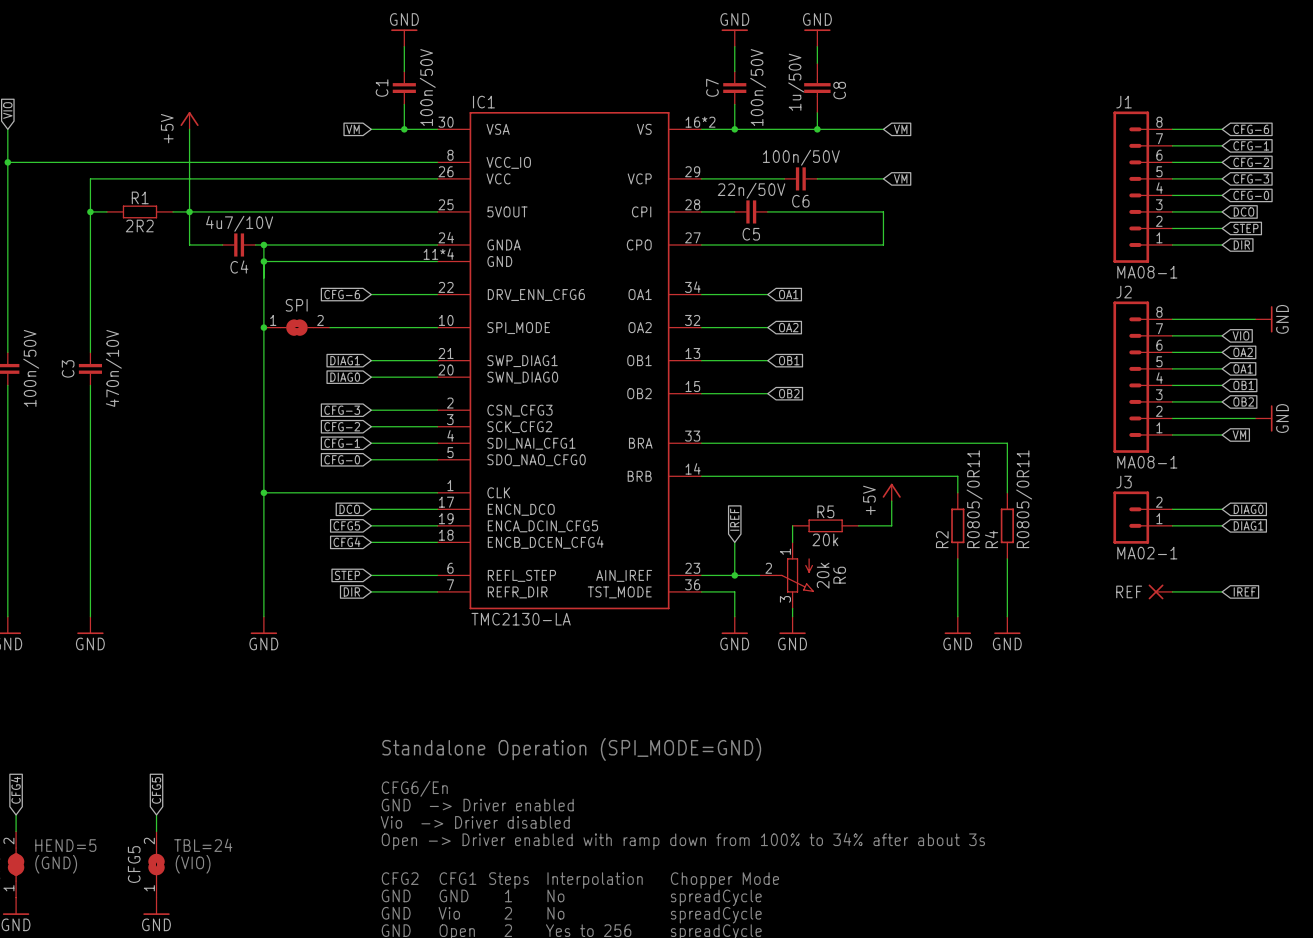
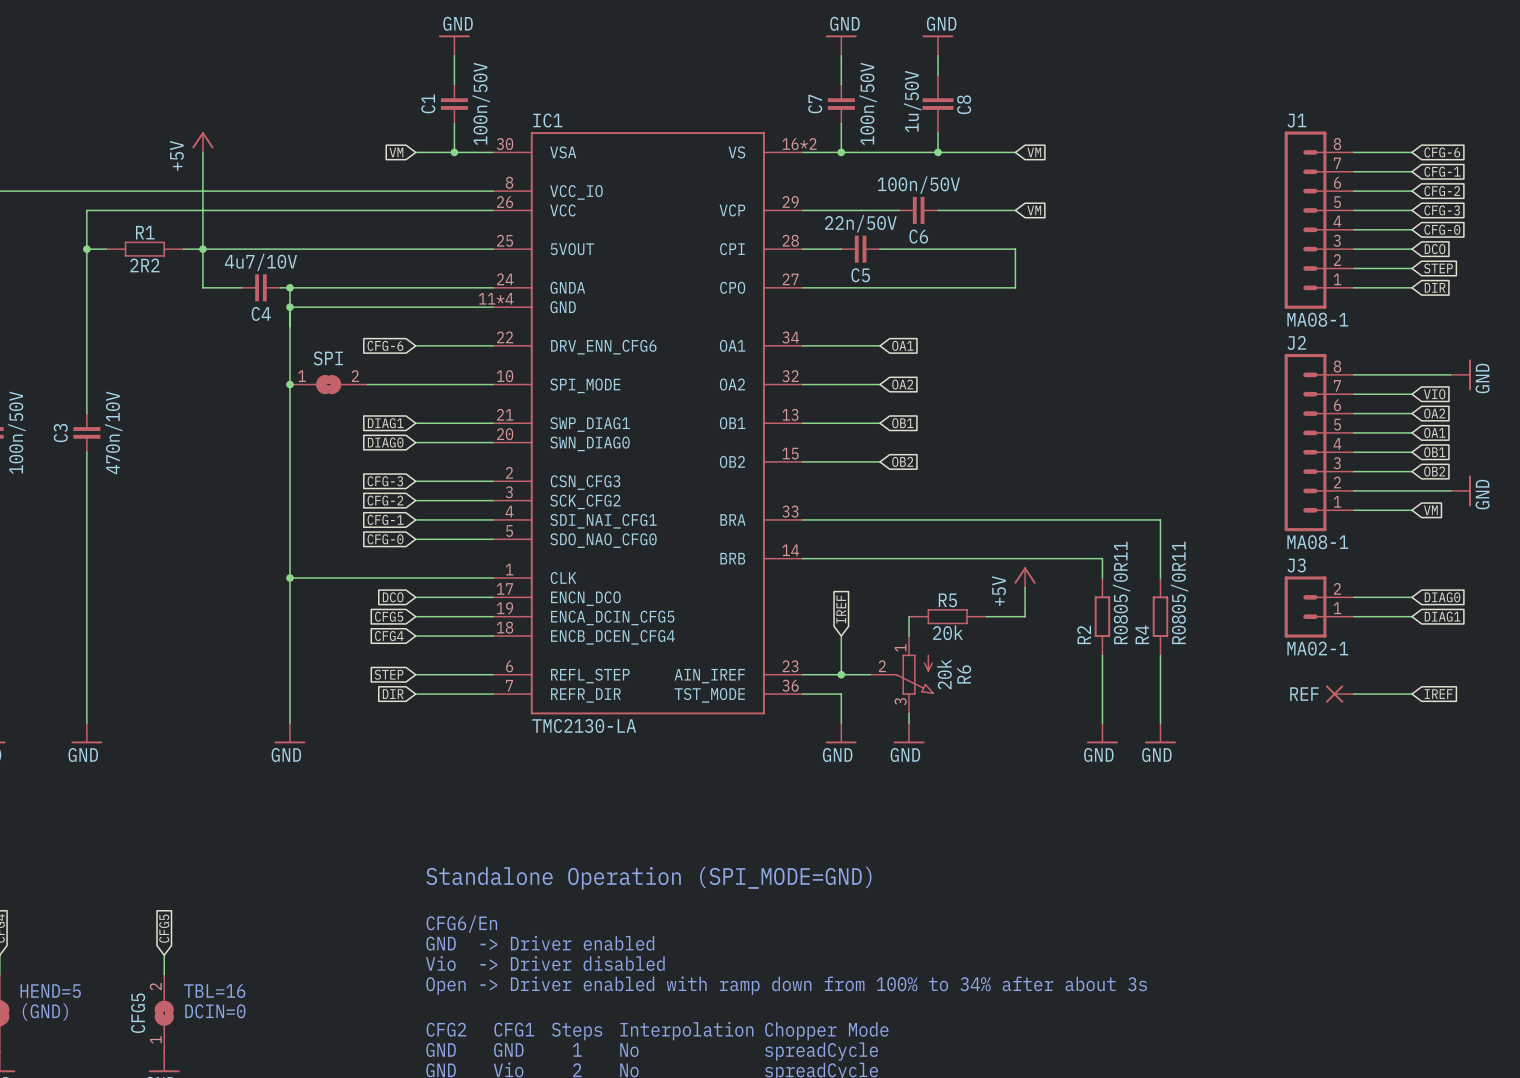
text: TBL=24 (203, 845) -> TBL=16 (214, 991)
text: (VIO) (193, 864) -> DCIN=0 (215, 1011)

